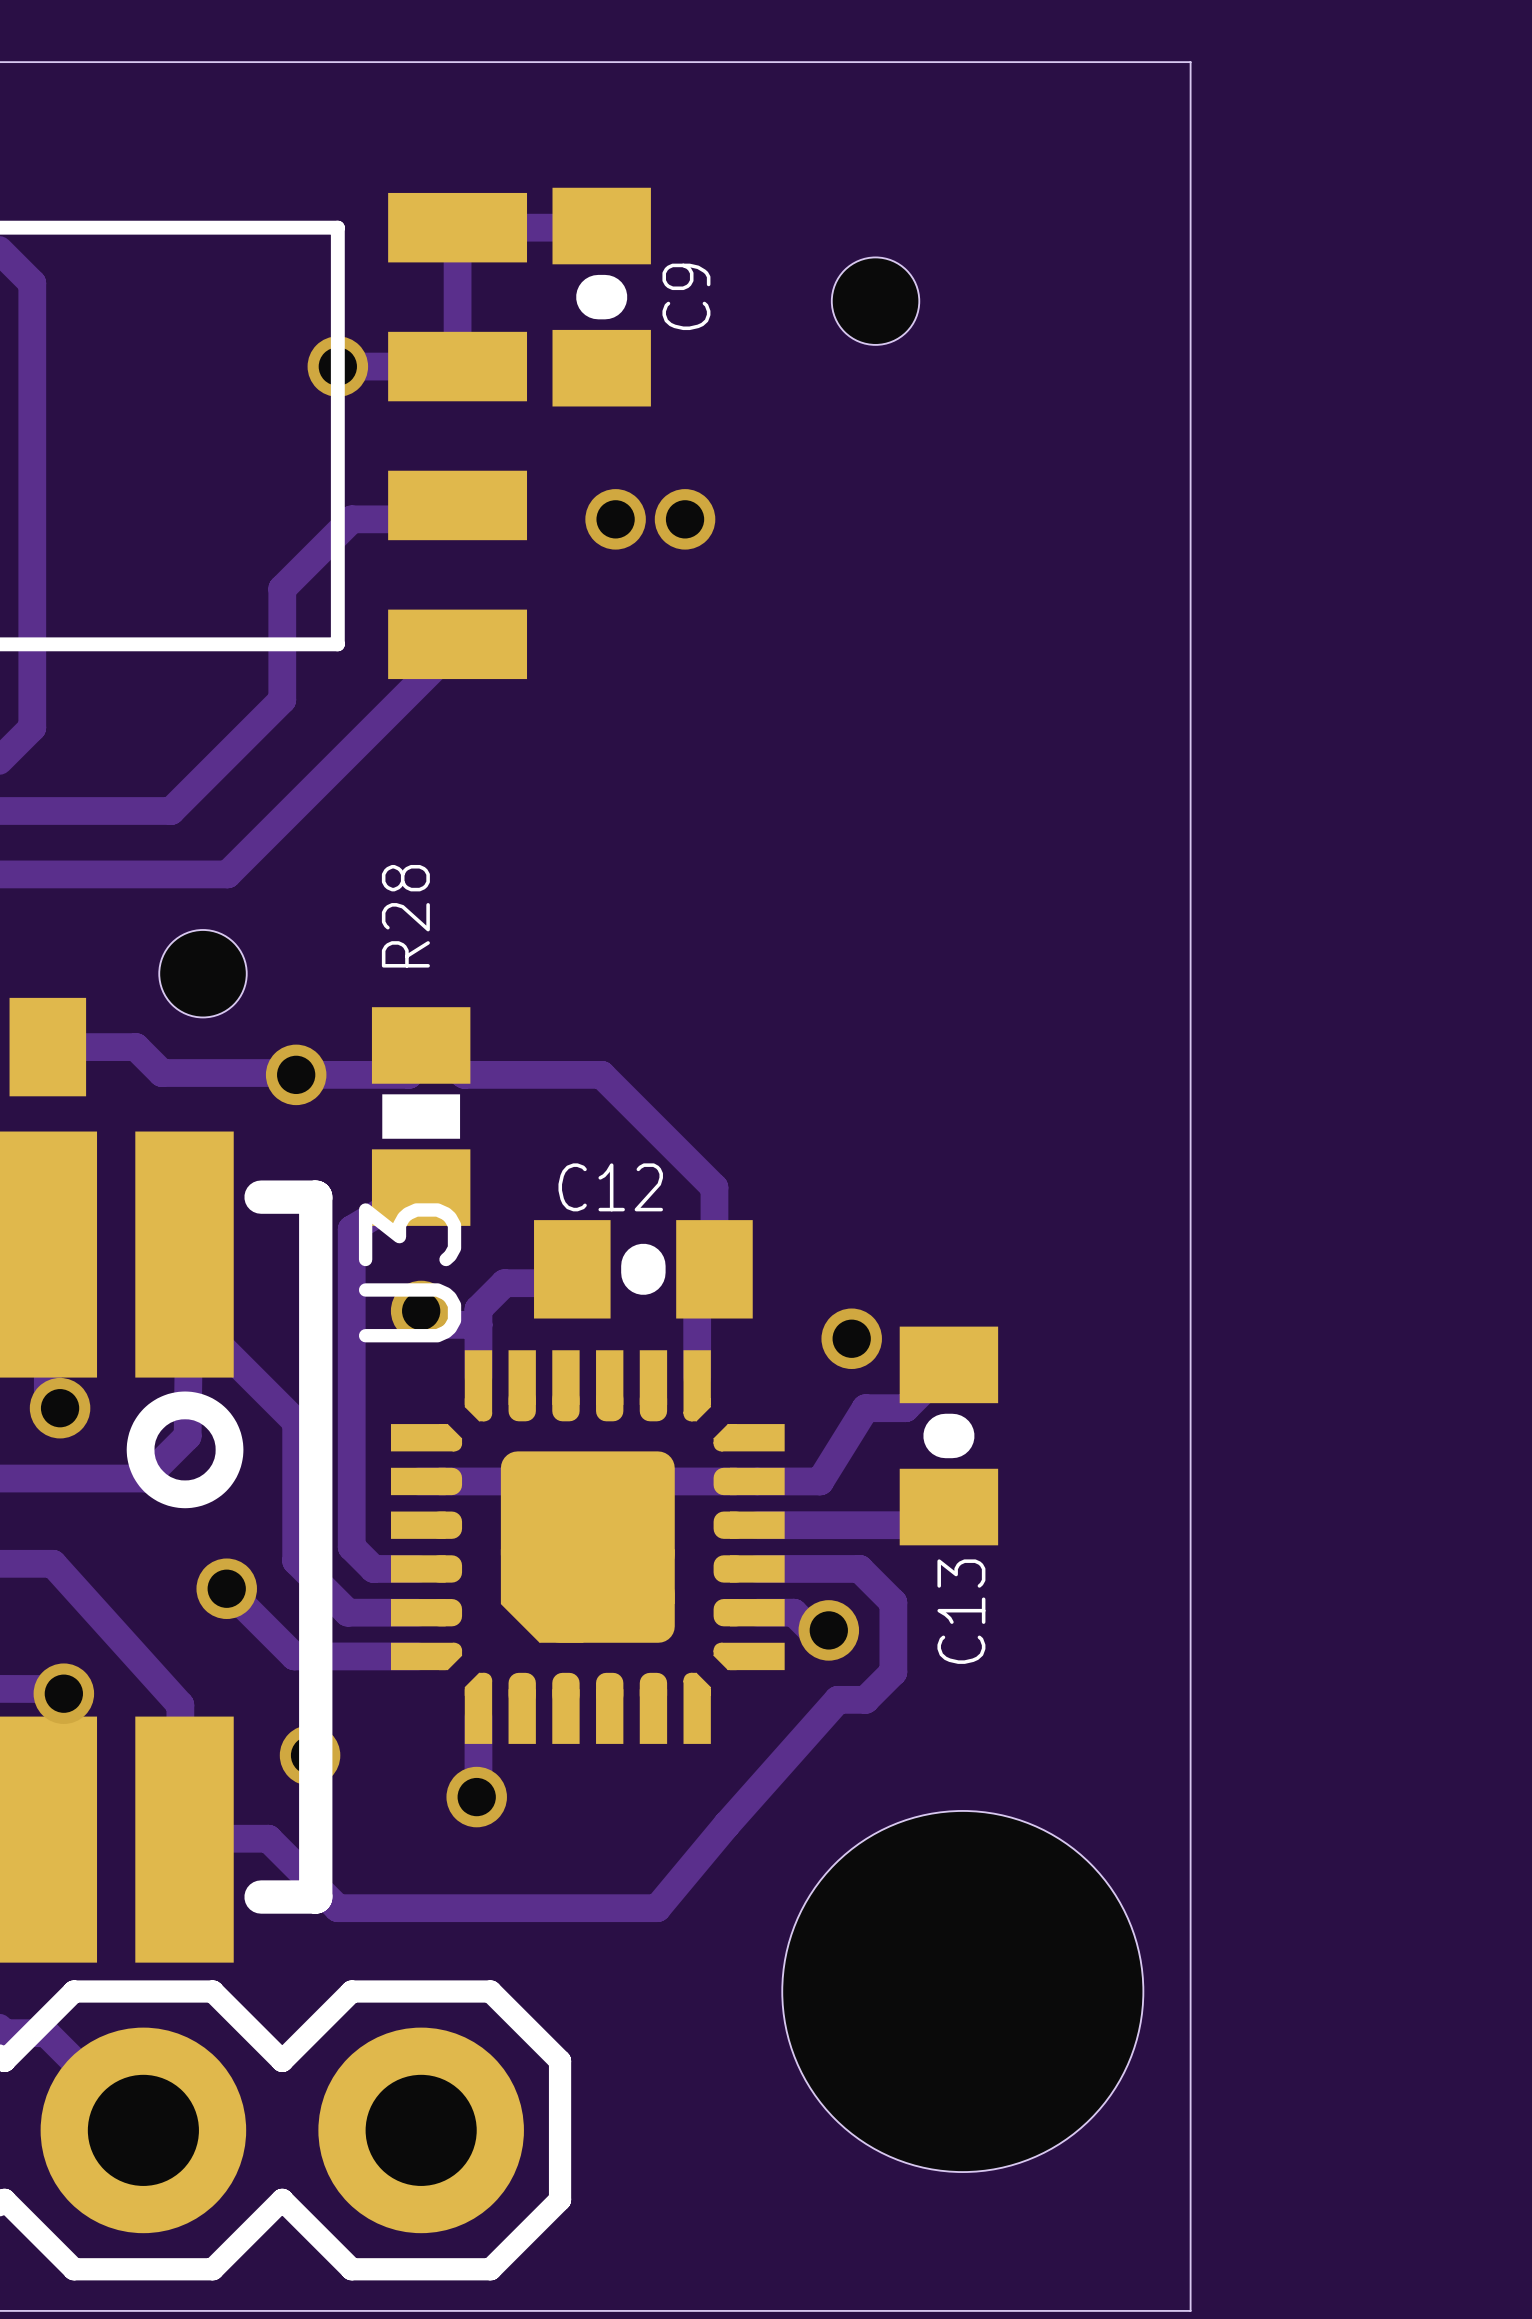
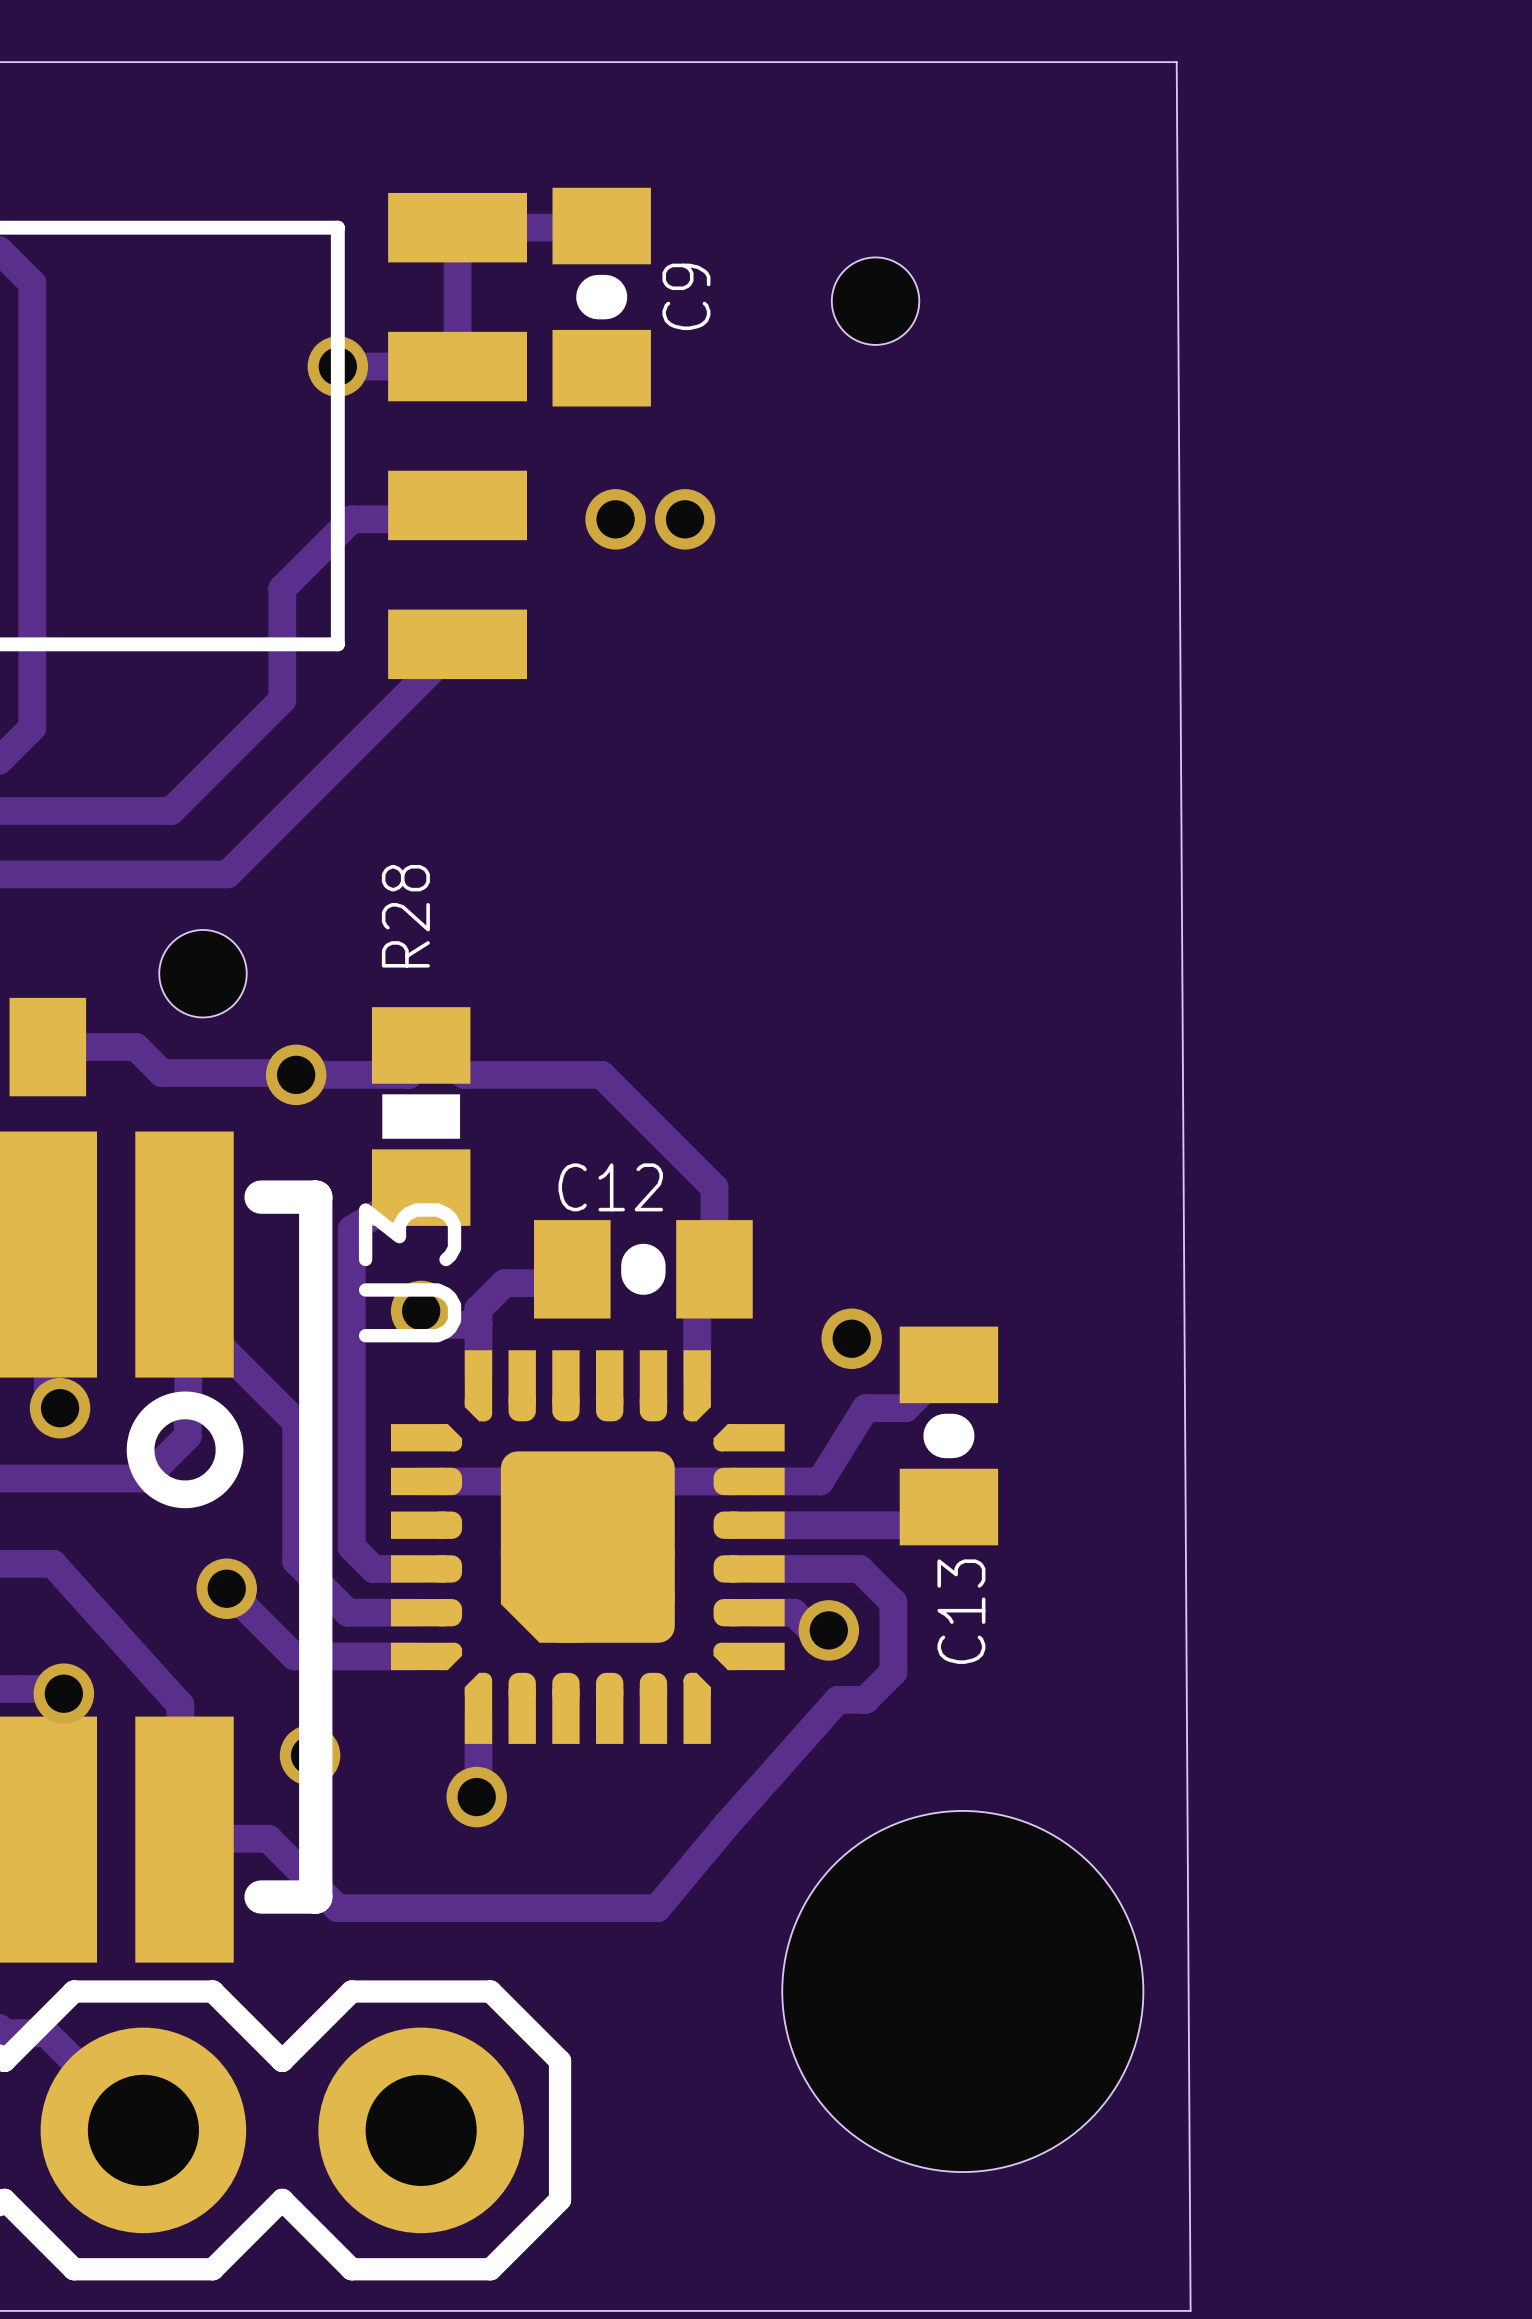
board edge: (1176, 62) (1190, 62) (1190, 2310) -> (1176, 62) (1190, 2310)

